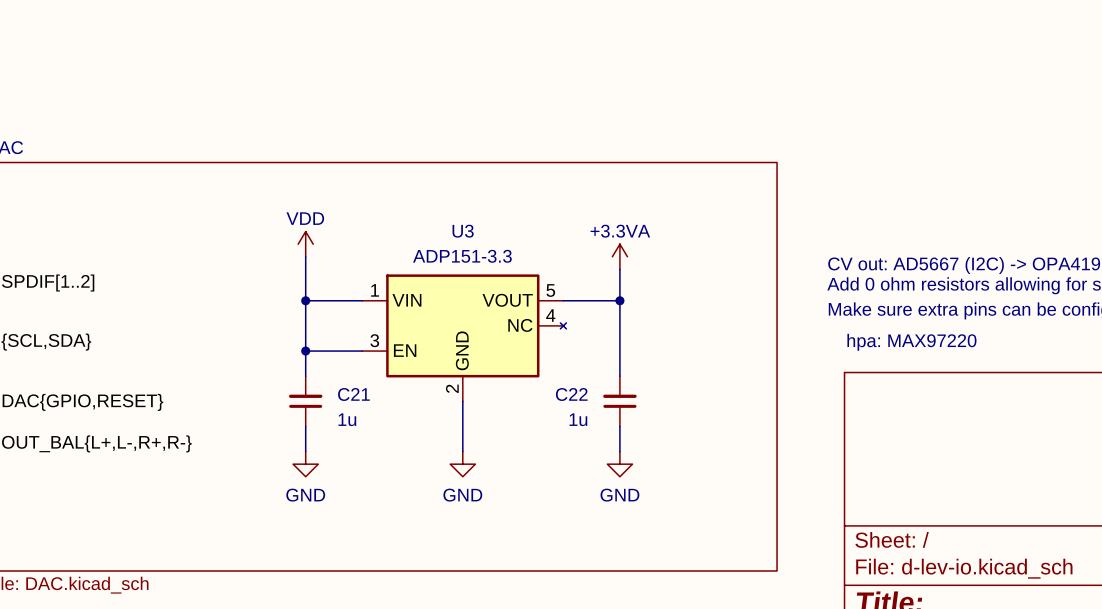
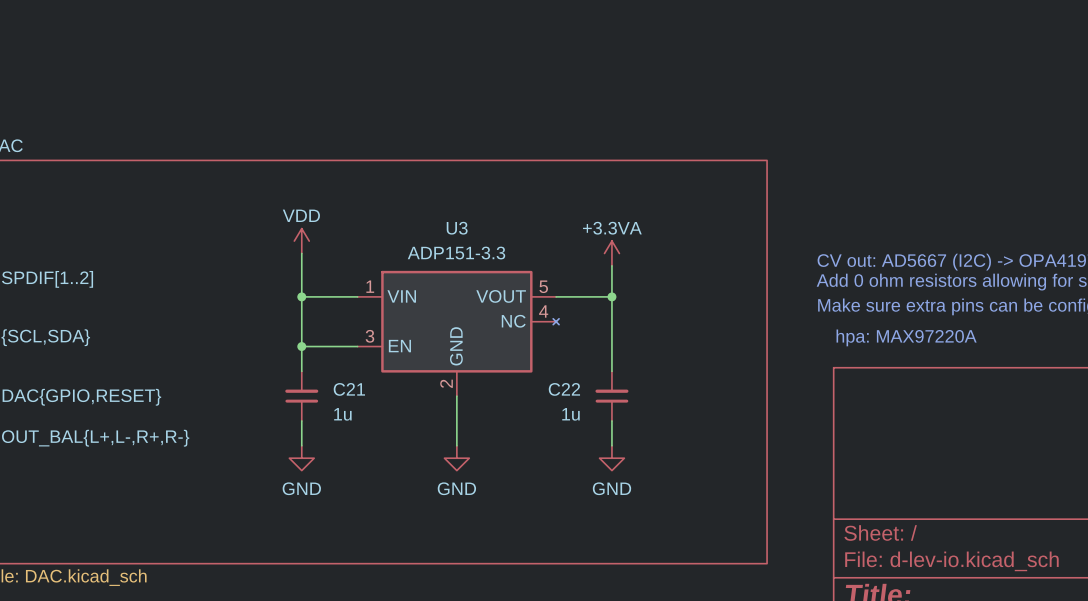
text: hpa: MAX97220 (911, 342) -> hpa: MAX97220A (906, 337)

